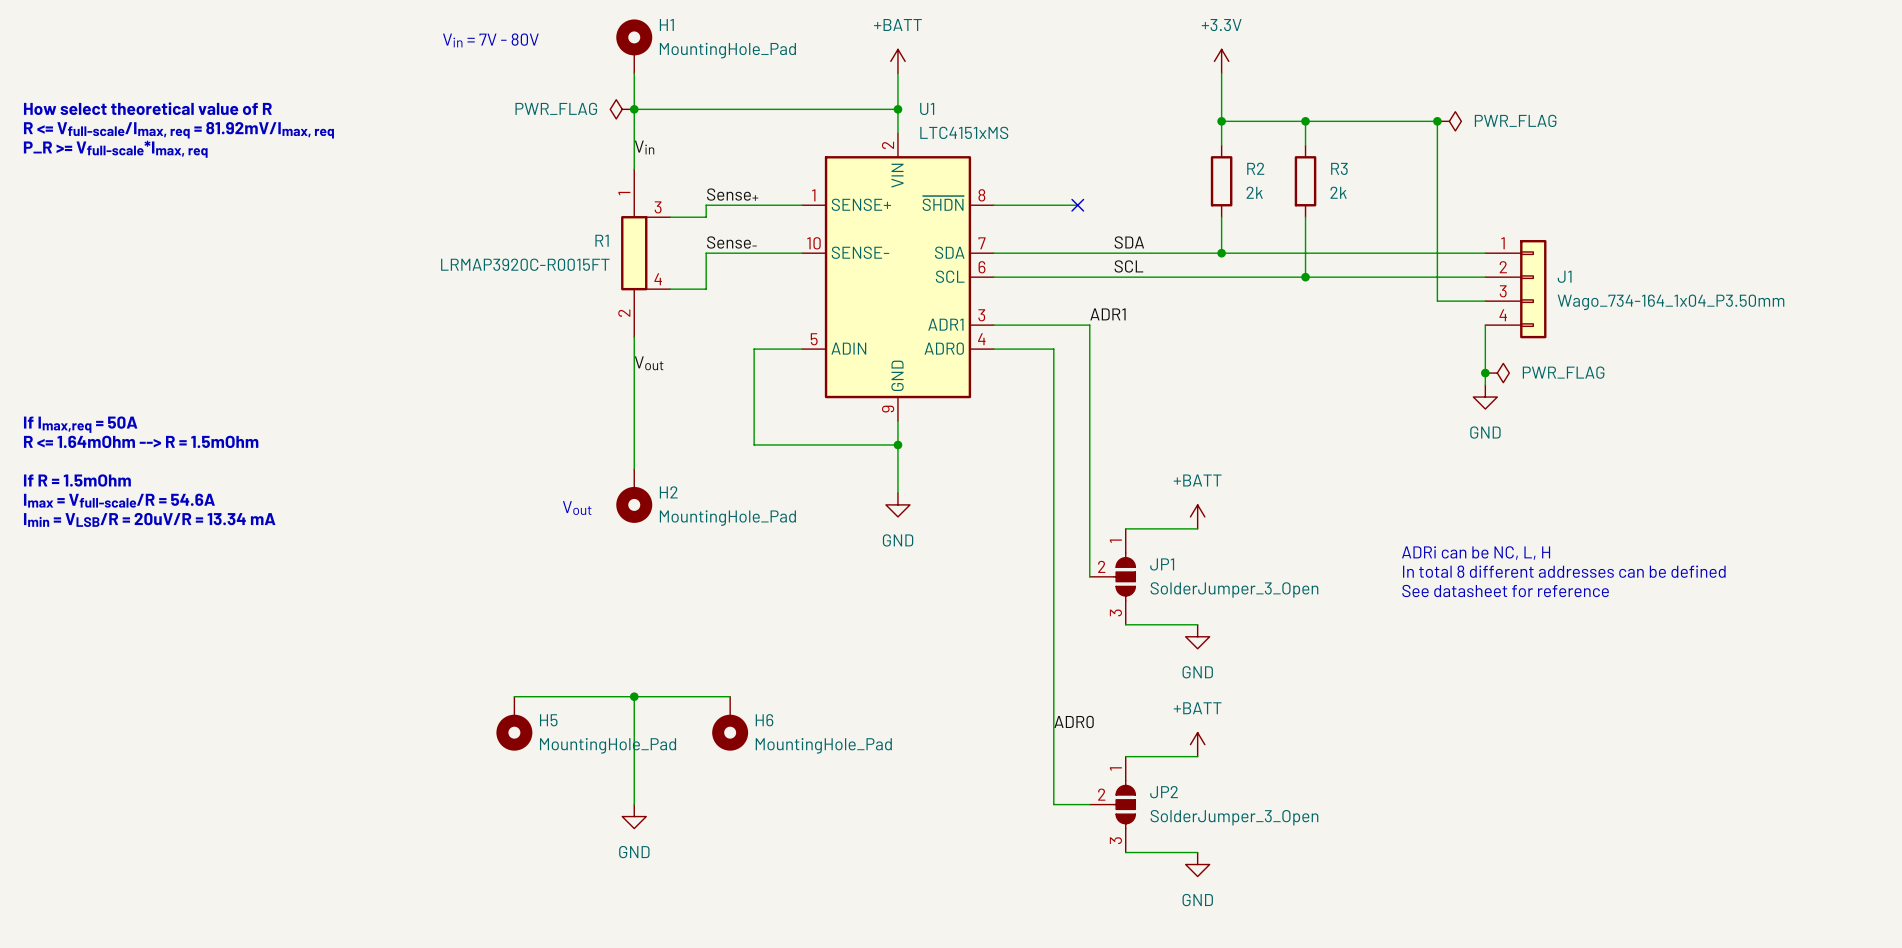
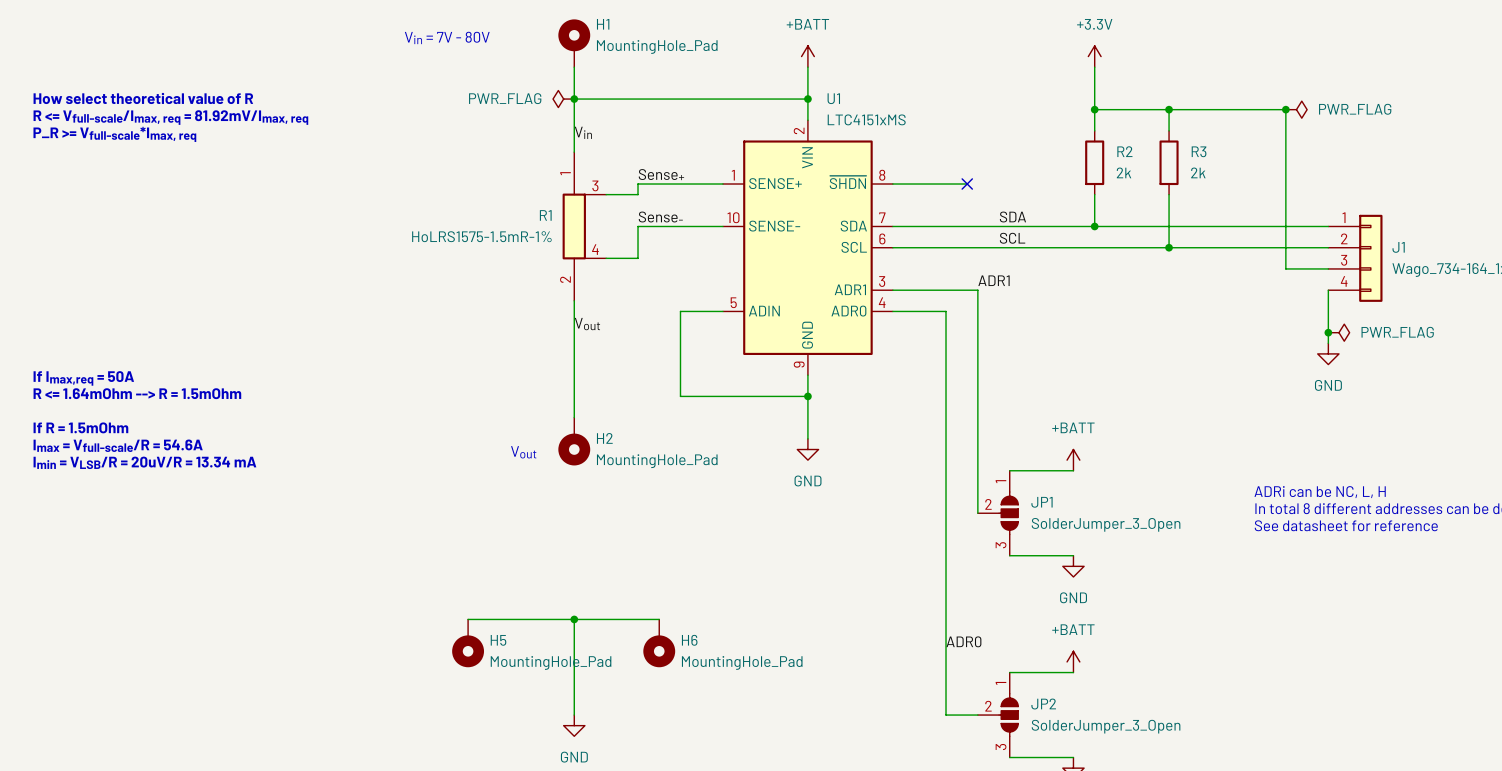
R1 value: LRMAP3920C-R0015FT (525, 264) -> HoLRS1575-1.5mR-1% (481, 236)

